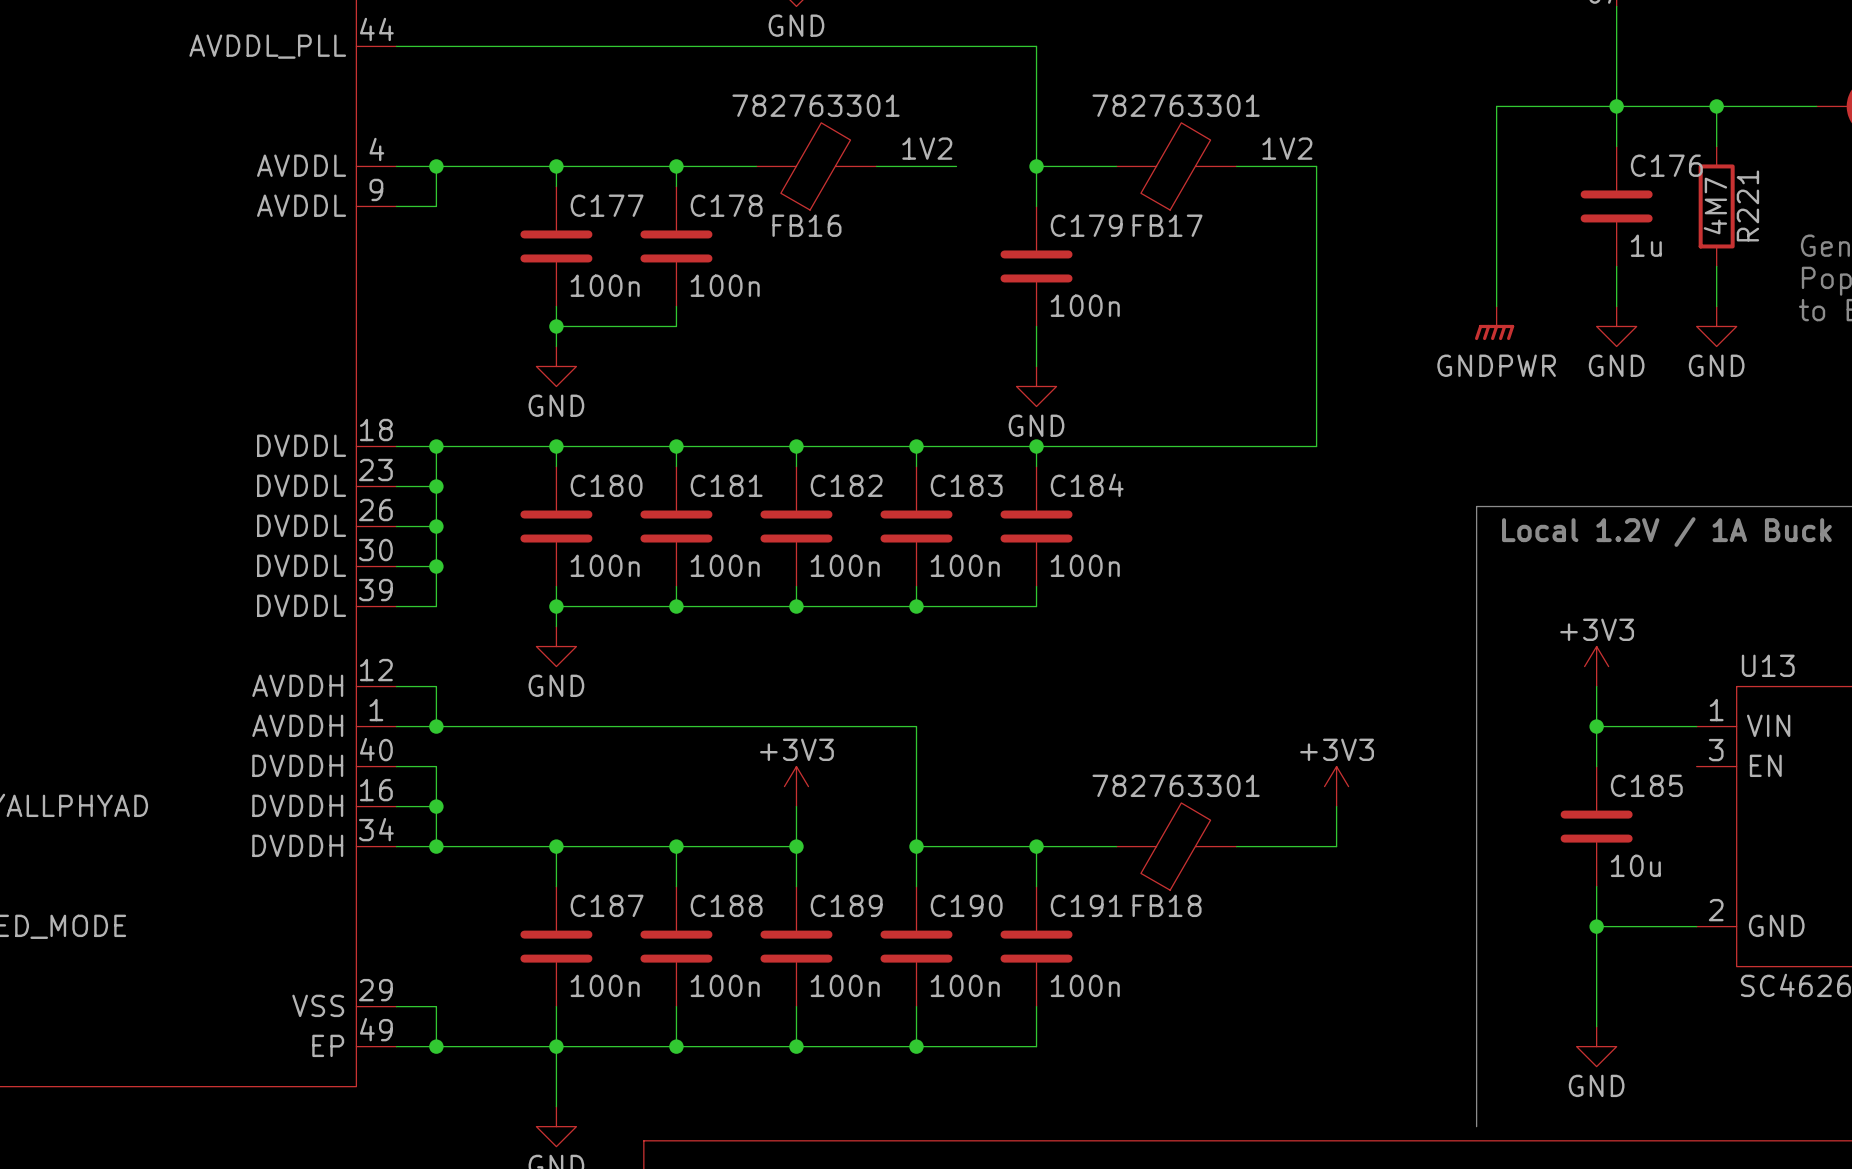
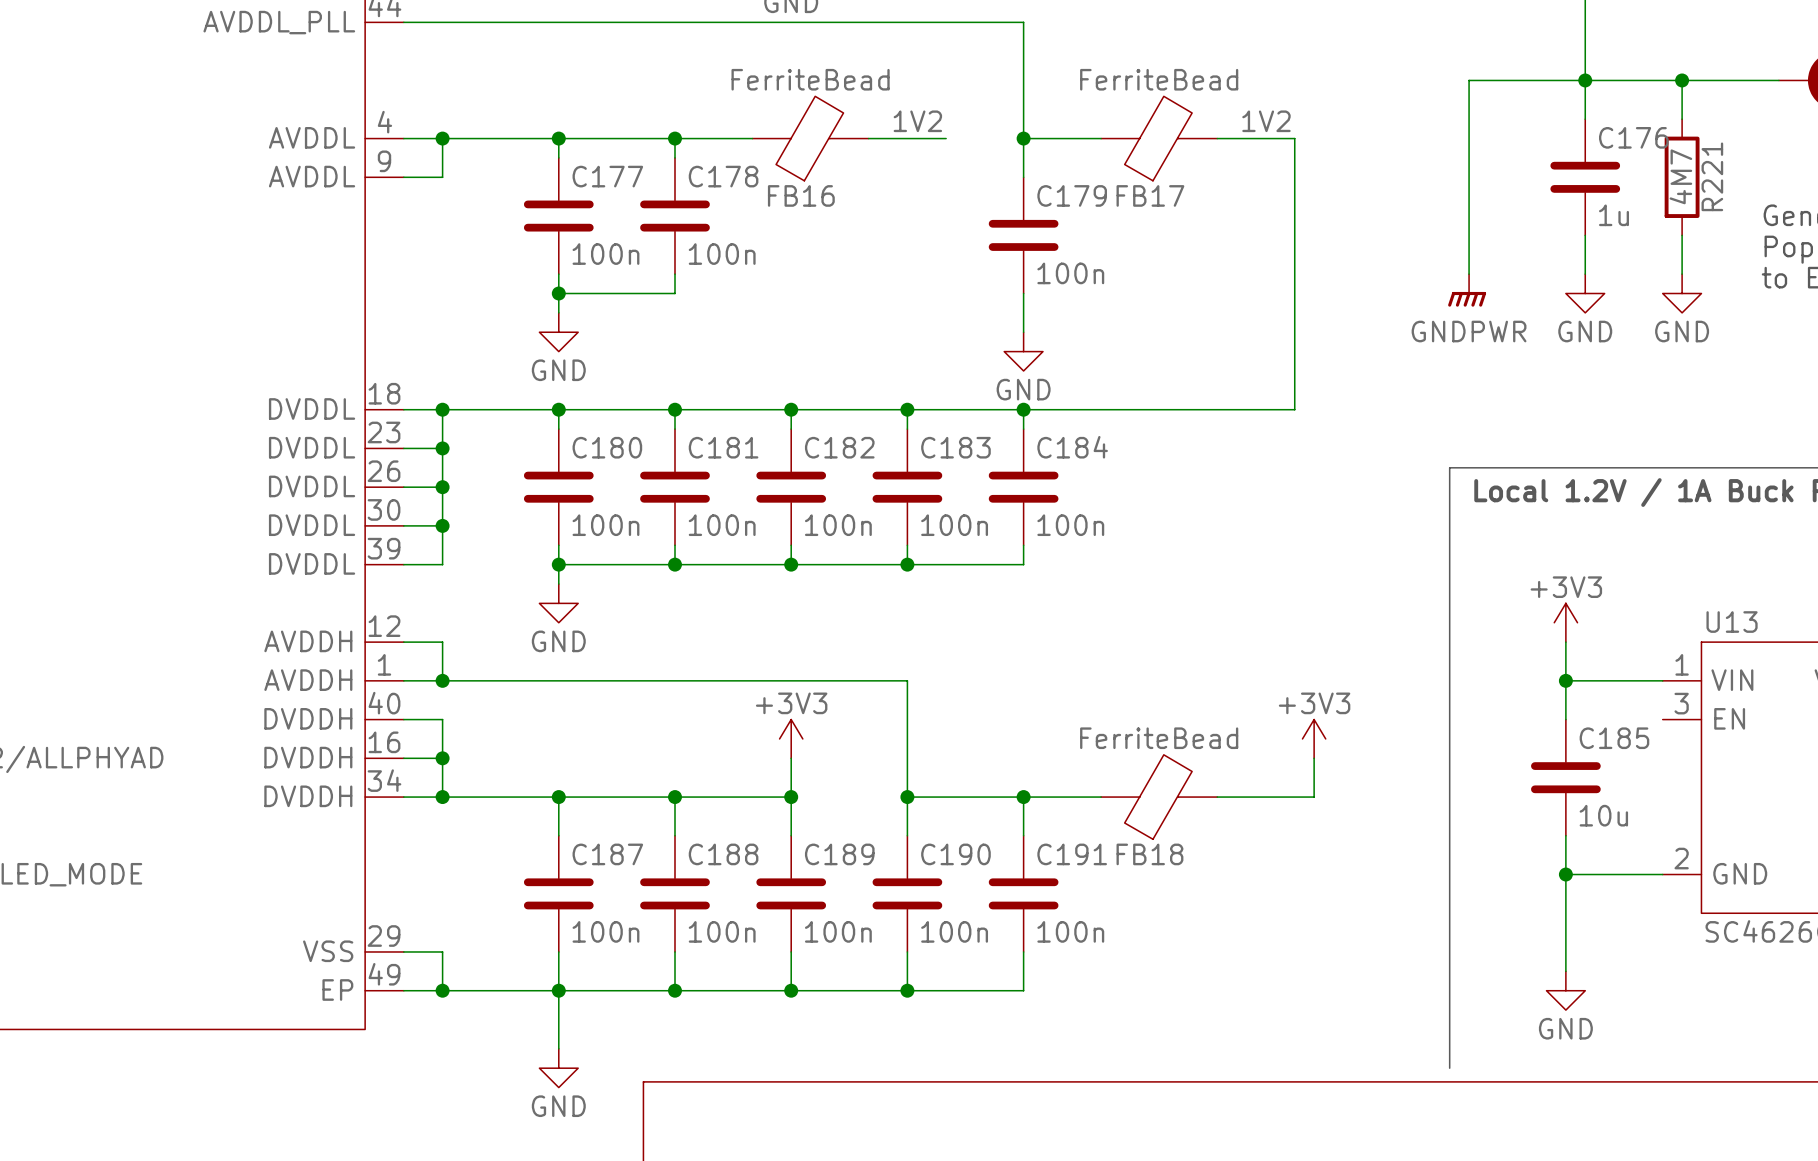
FB16 value: 782763301 (816, 105) -> FerriteBead (810, 79)
FB17 value: 782763301 (1176, 105) -> FerriteBead (1159, 79)
FB18 value: 782763301 (1176, 785) -> FerriteBead (1159, 738)

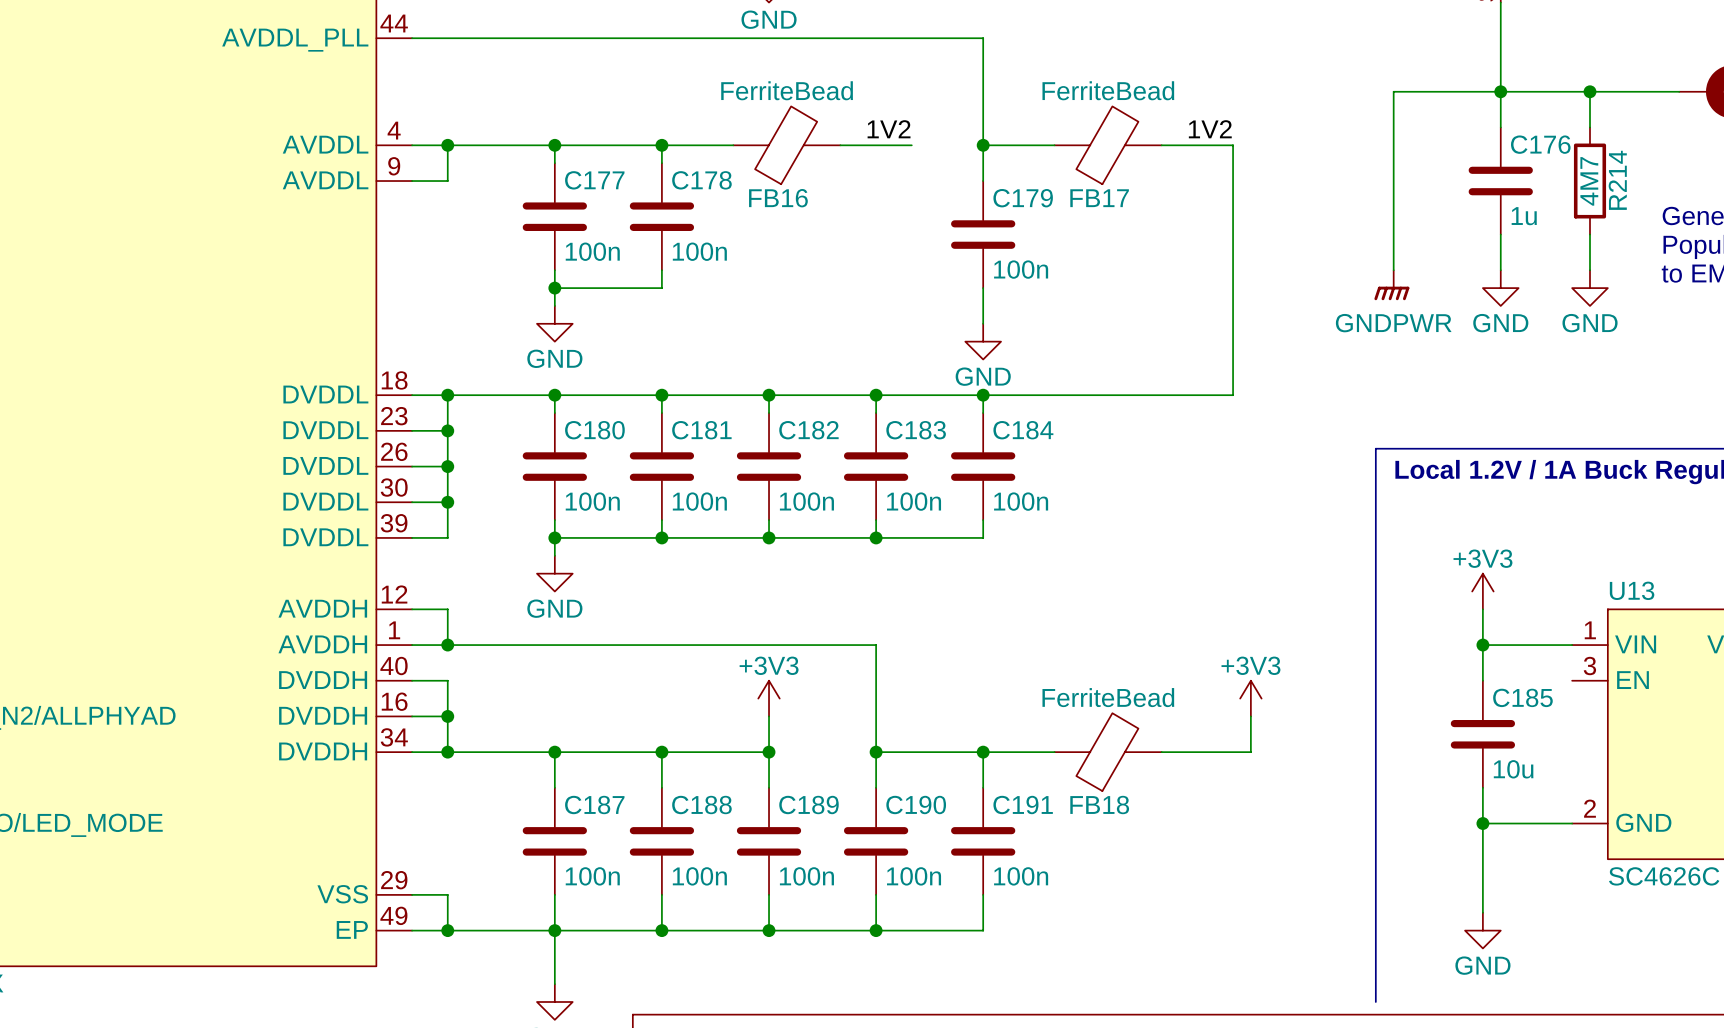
R221 name: R221 (1712, 176) -> R214 (1617, 180)

